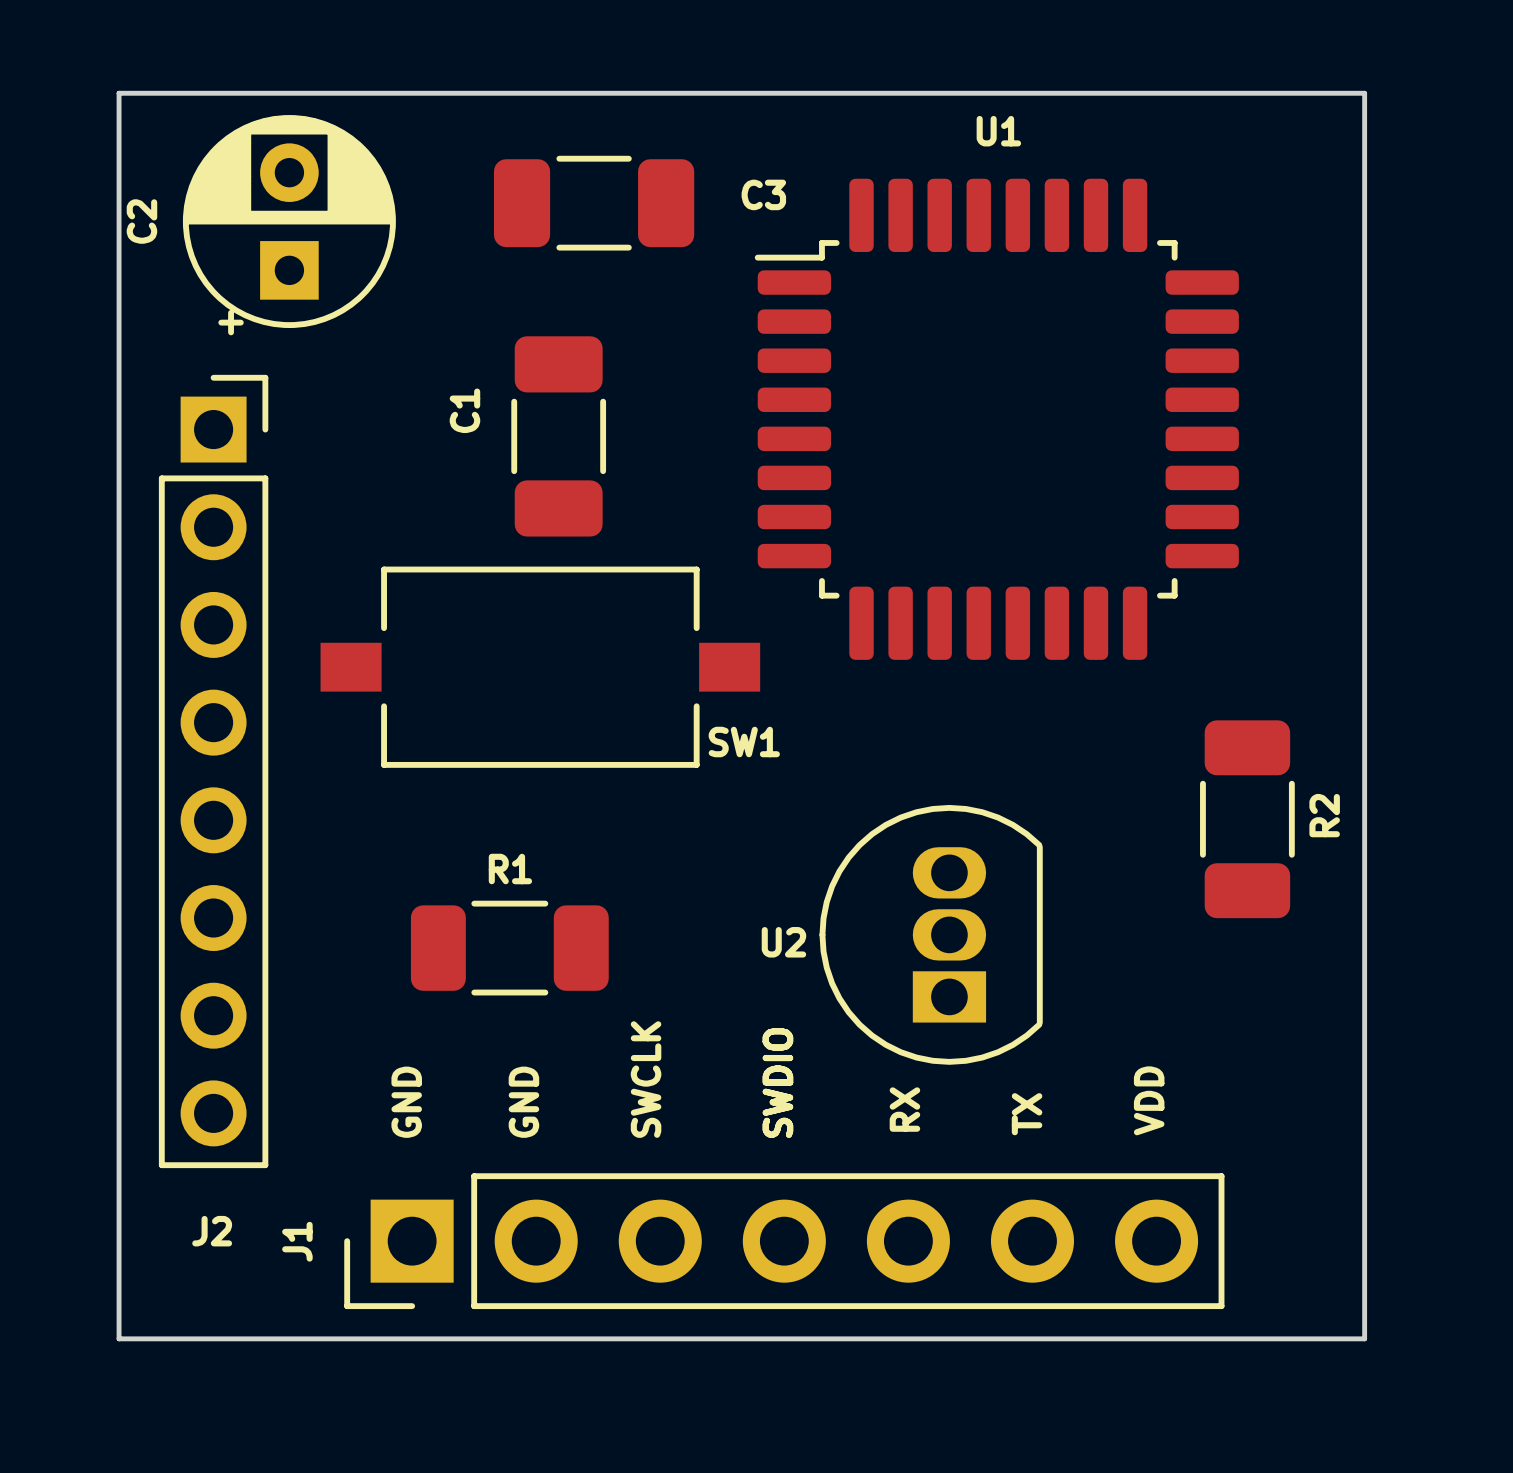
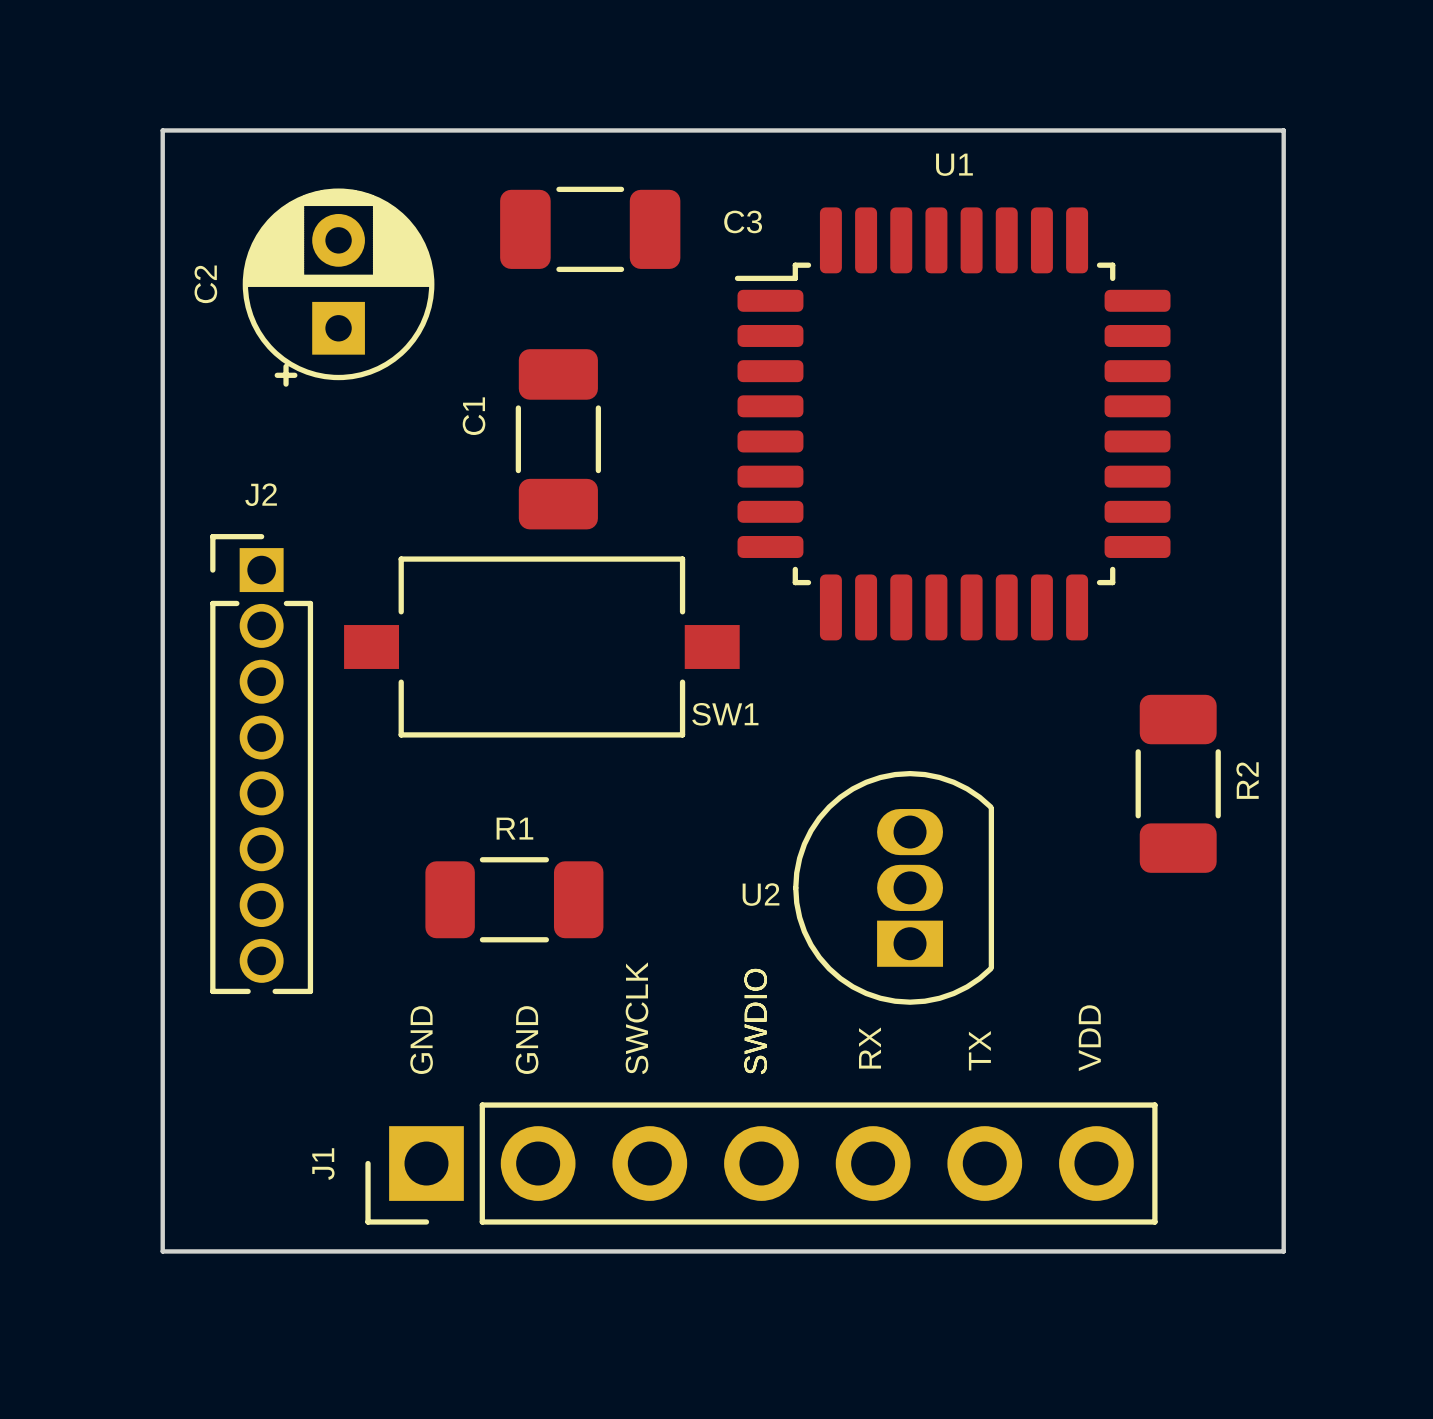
C2 position: (289, 225) -> (338, 287)
J2 footprint: [158, 374, 269, 1169] -> [210, 534, 314, 995]
J2 name position: J2 (212, 1231) -> J2 (261, 494)

